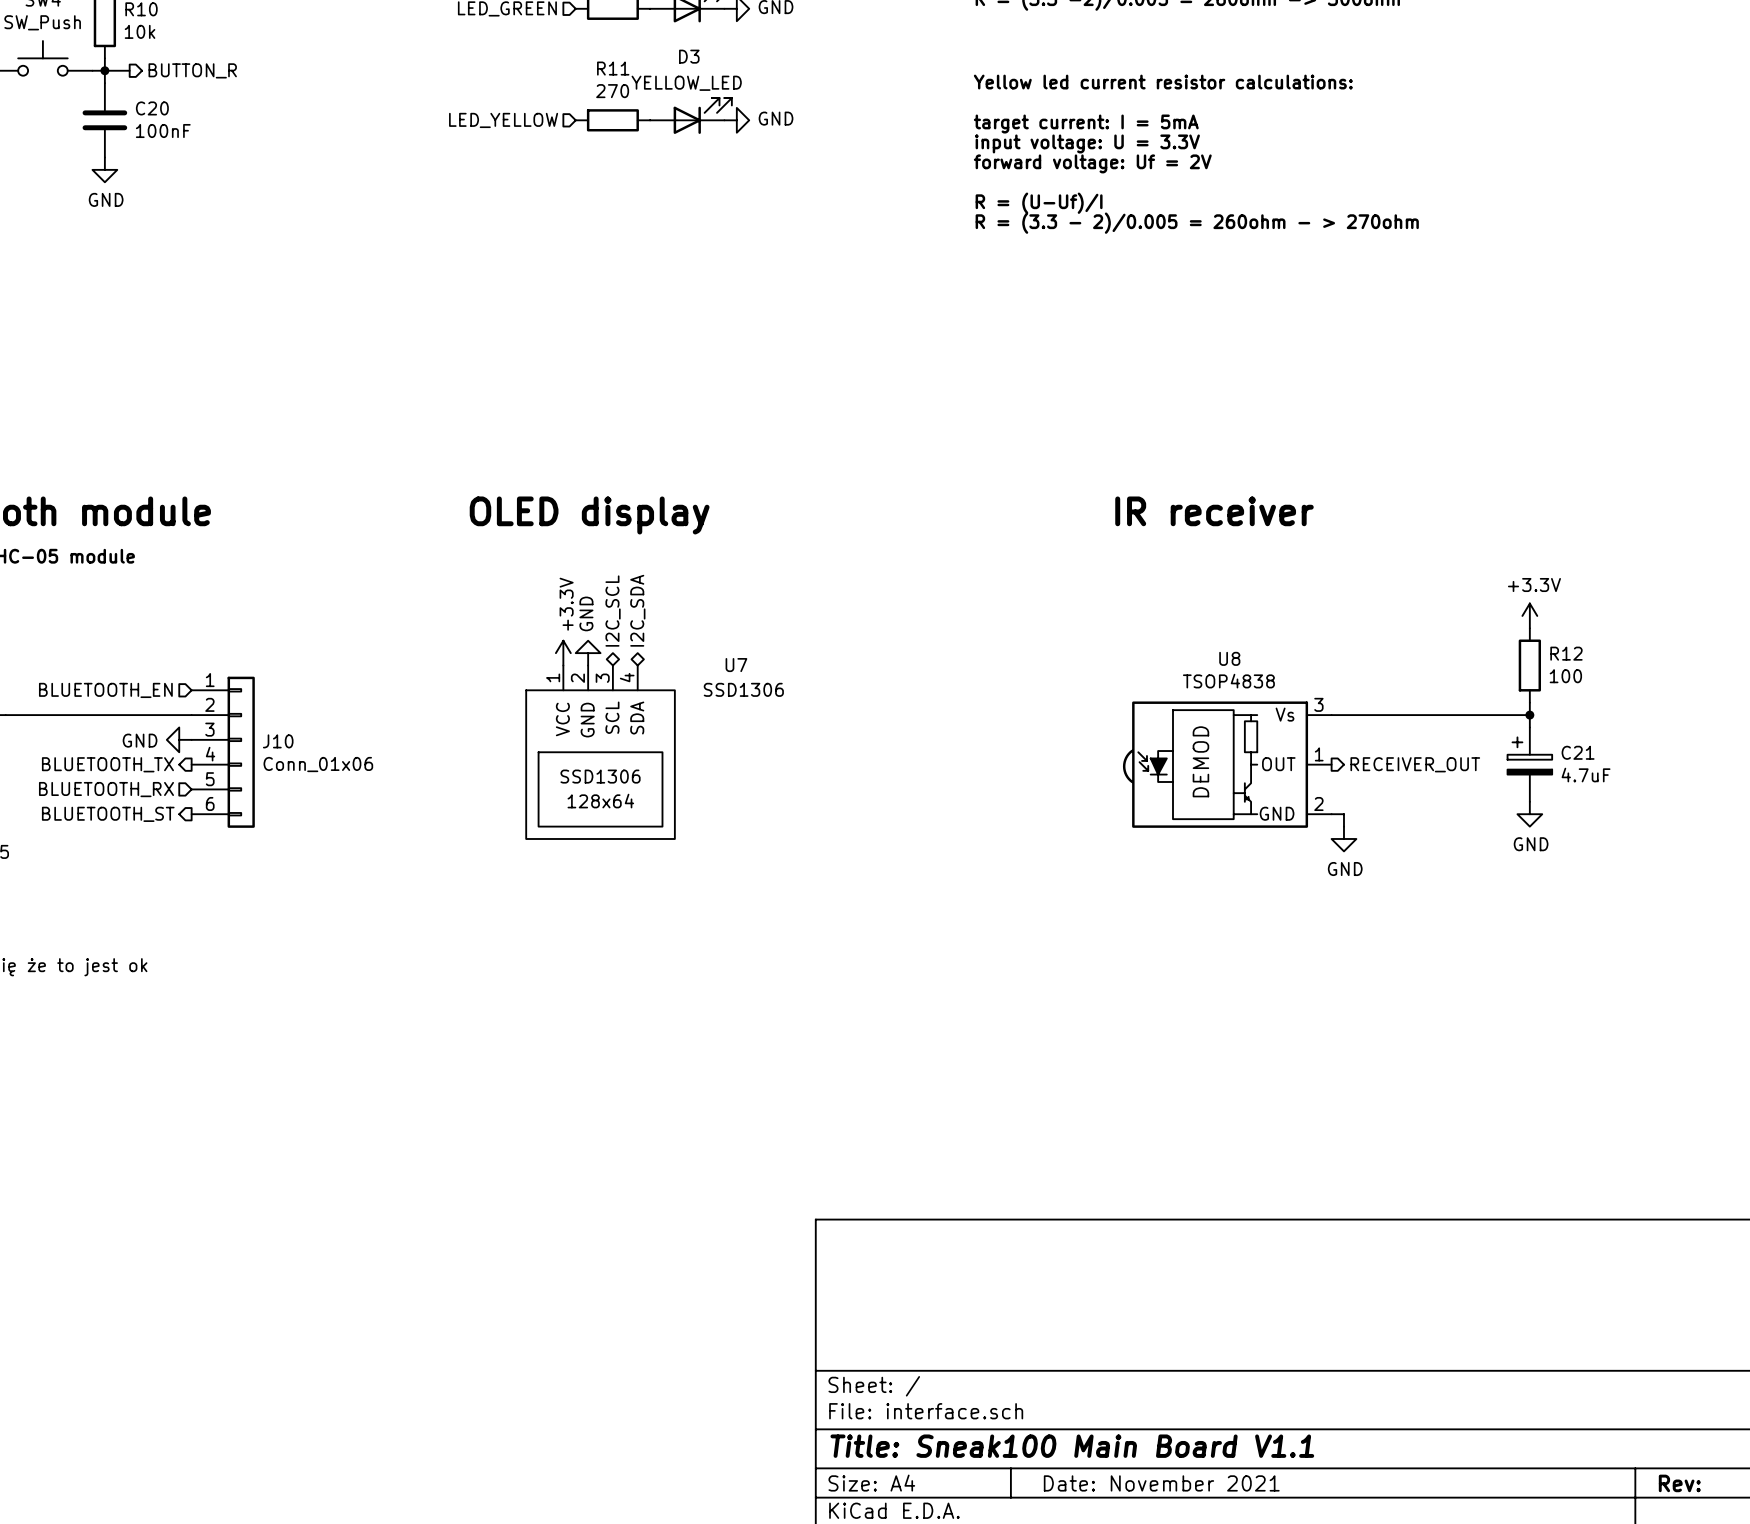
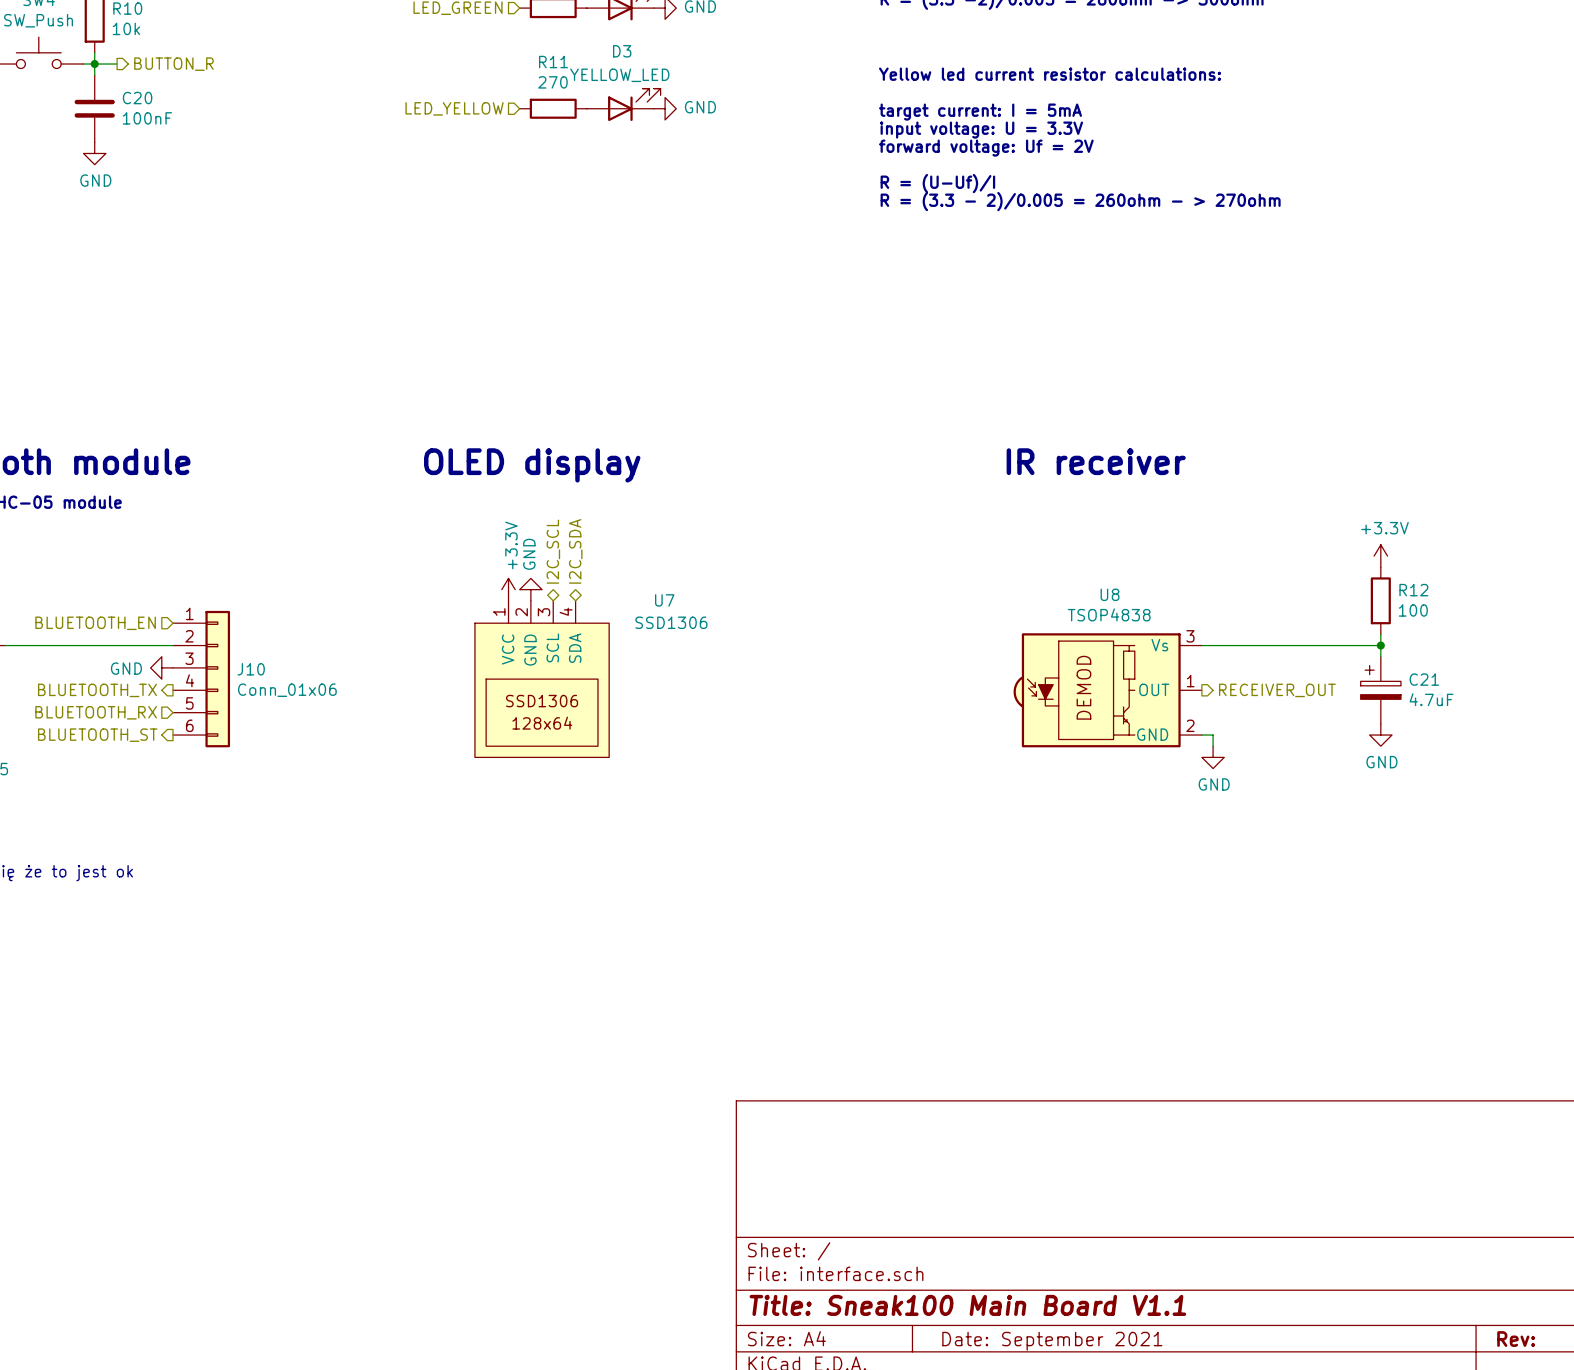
title block: Date: November 2021 (1161, 1483) -> Date: September 2021 (1052, 1341)

